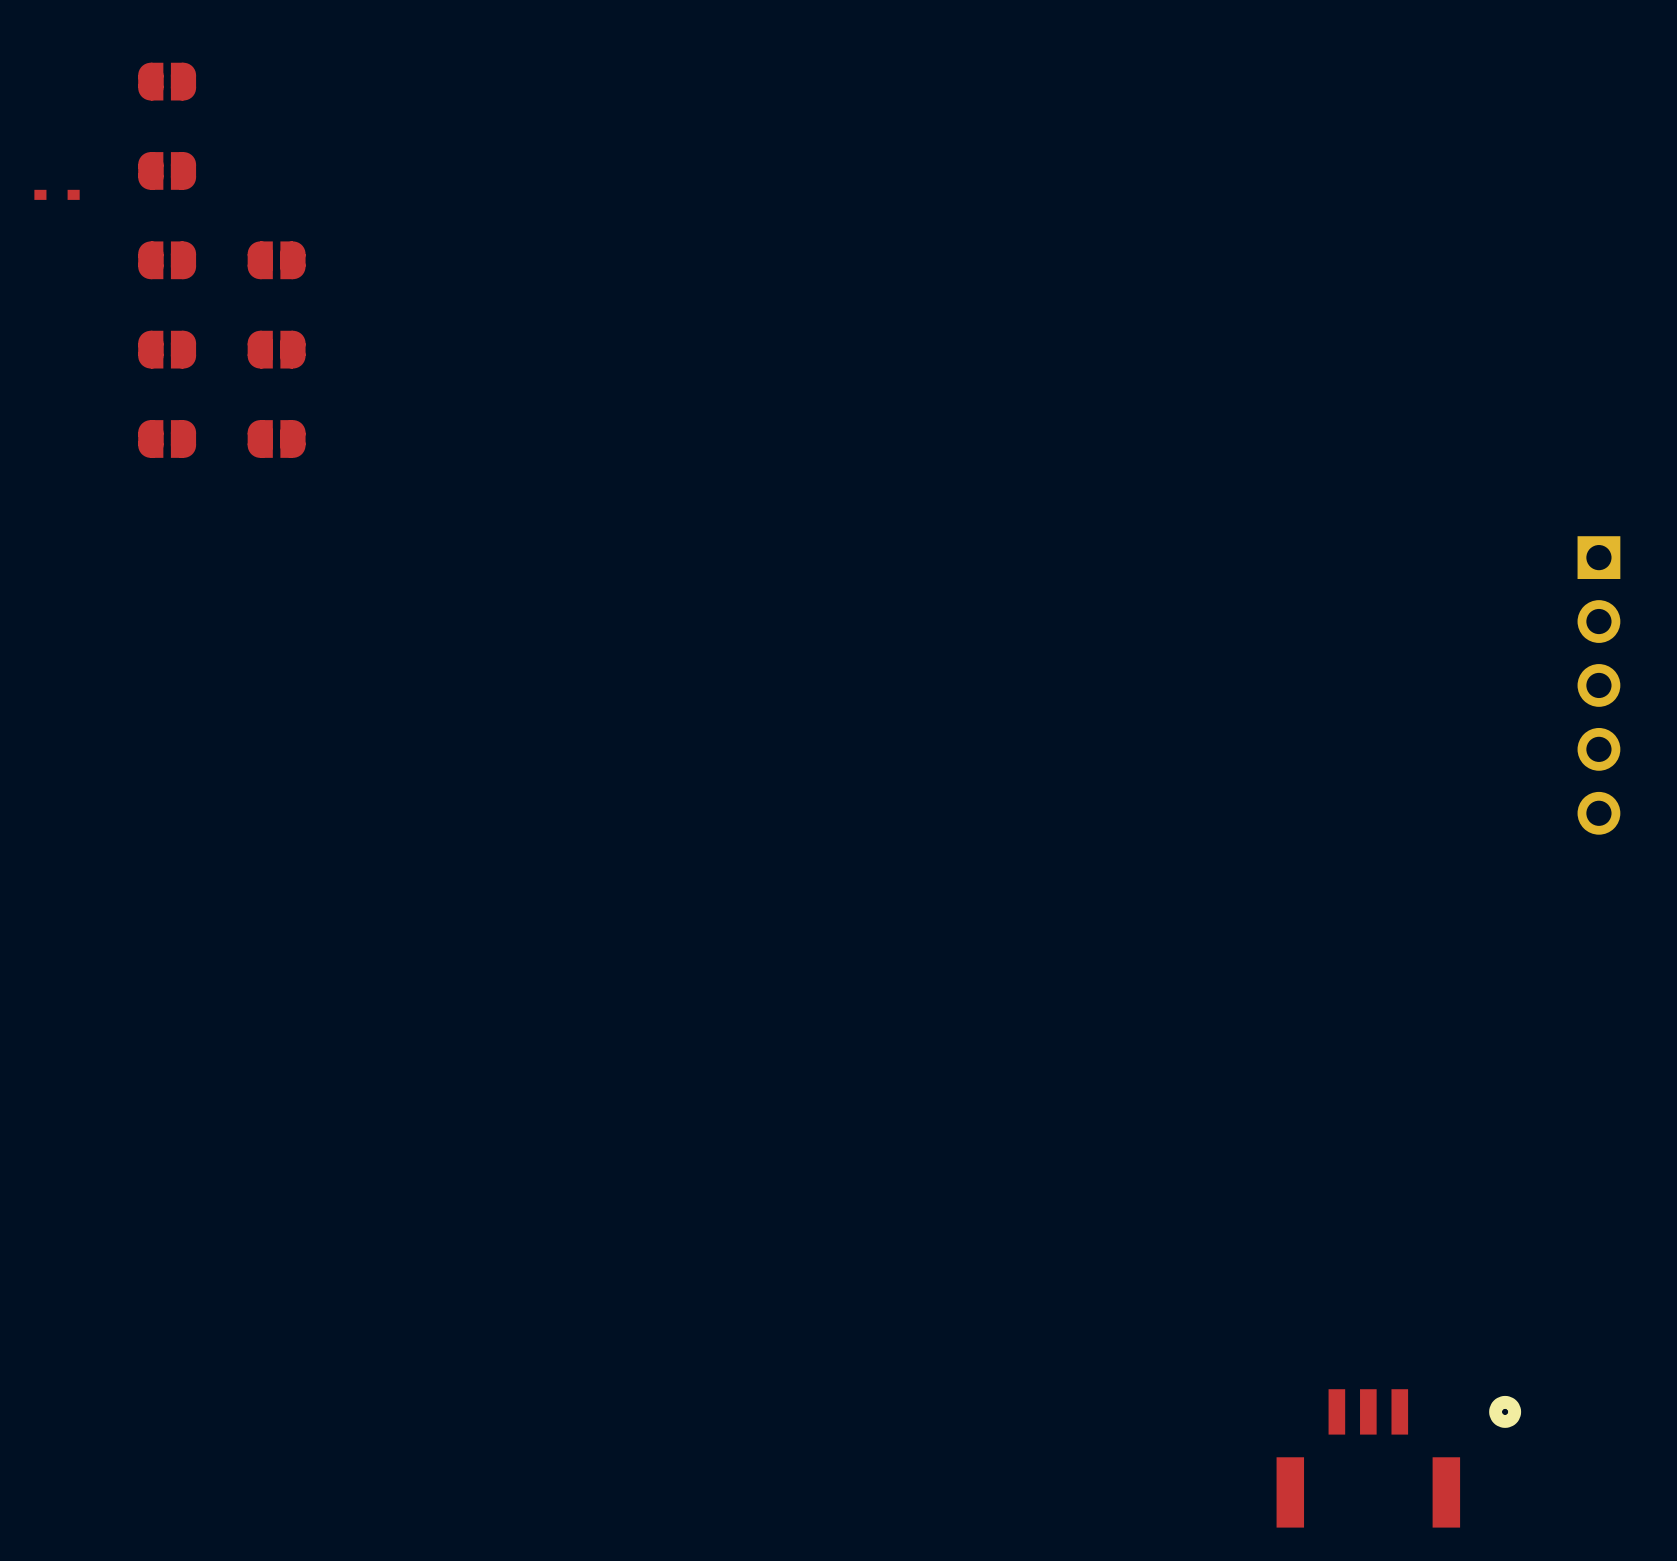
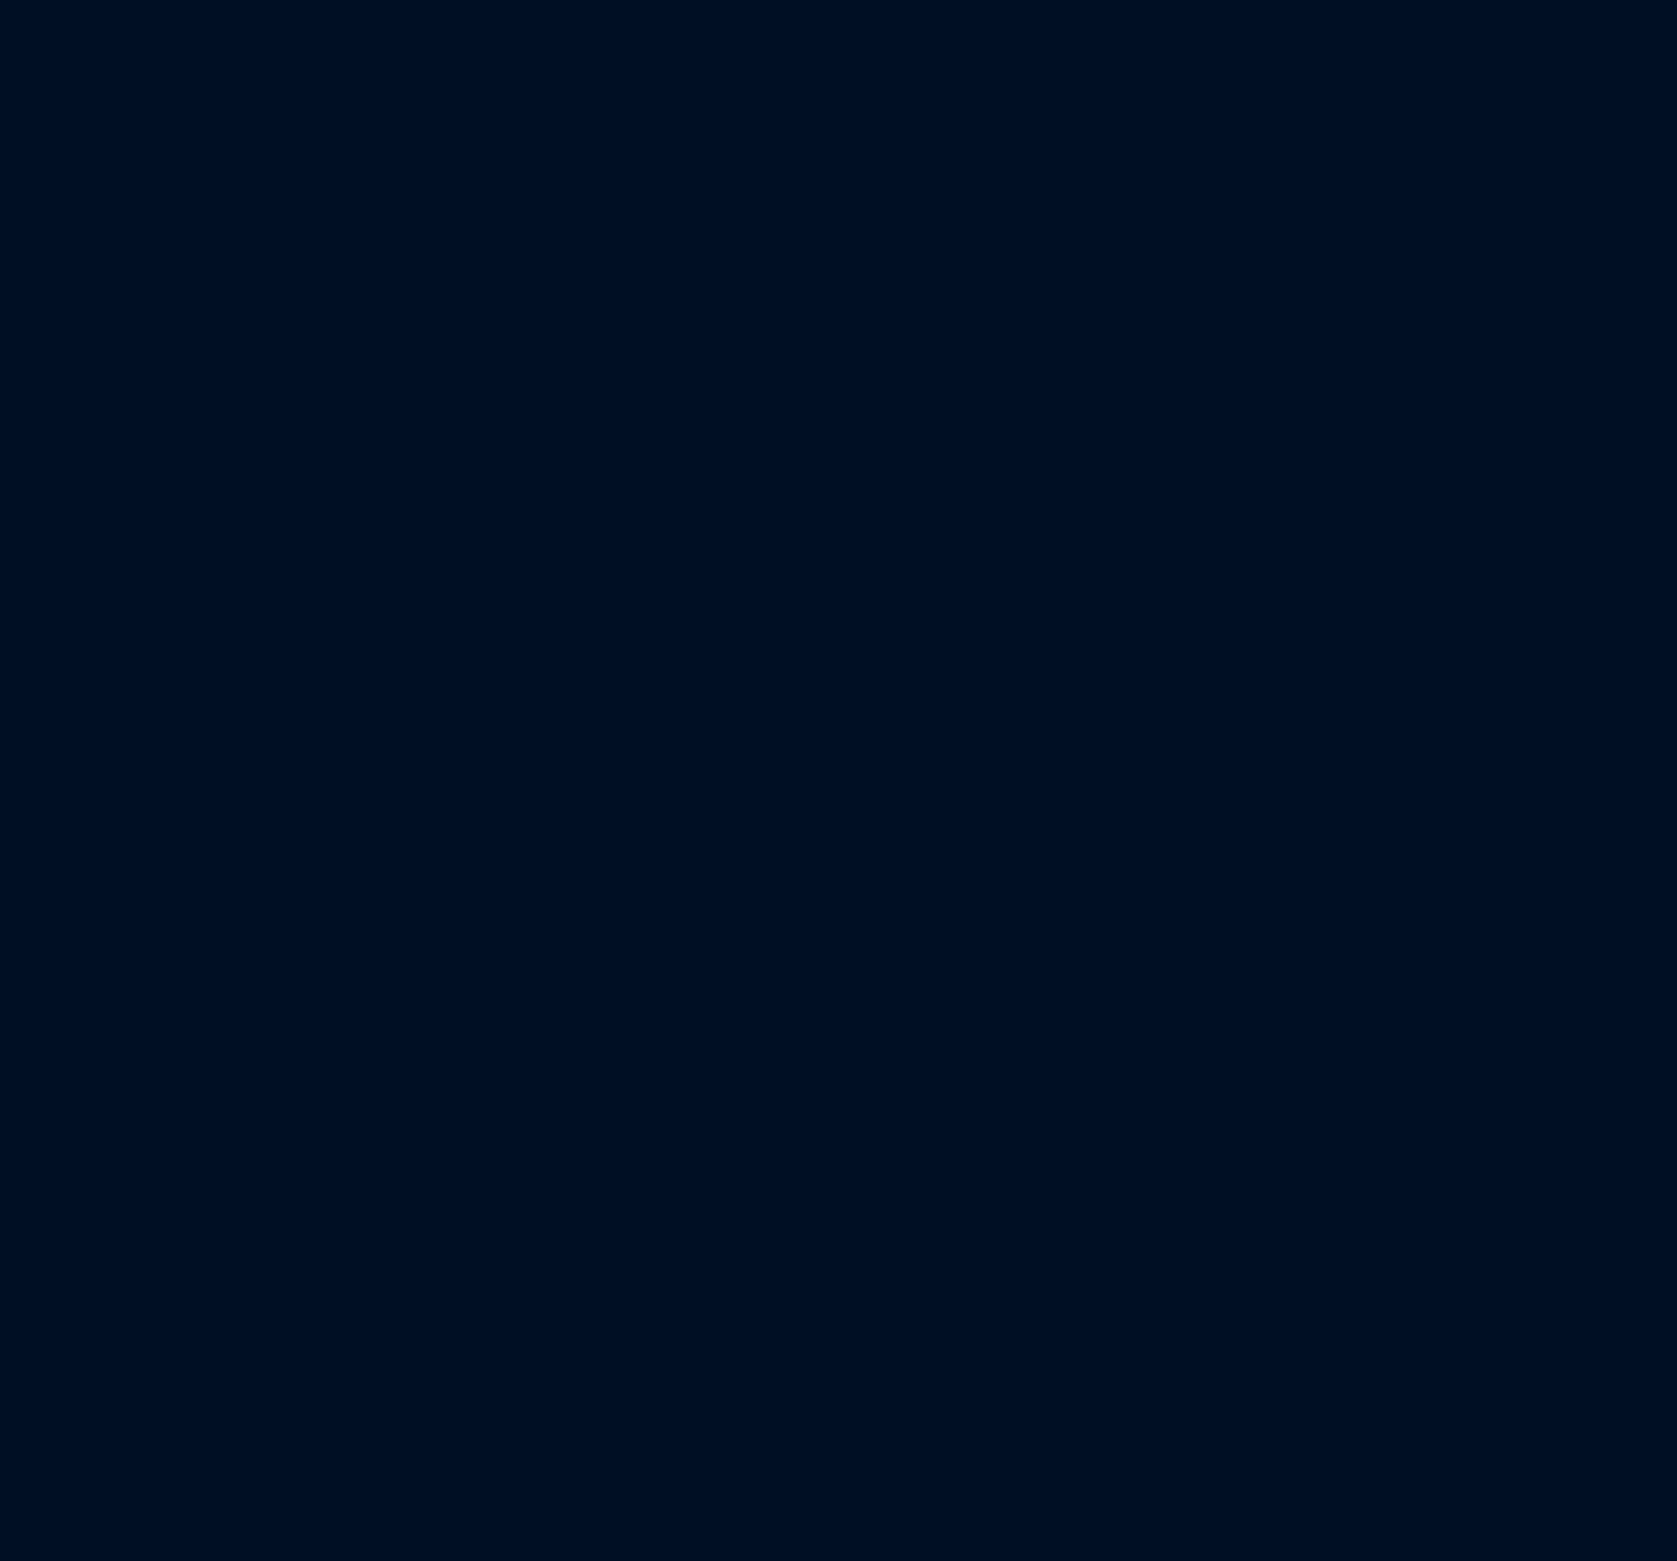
part: (167, 81) -> none
part: (167, 170) -> none
part: (57, 194) -> none
part: (167, 260) -> none
part: (276, 260) -> none
part: (167, 349) -> none
part: (276, 349) -> none
part: (167, 438) -> none
part: (276, 438) -> none
part: (1598, 685) -> none
part: (1398, 1458) -> none

